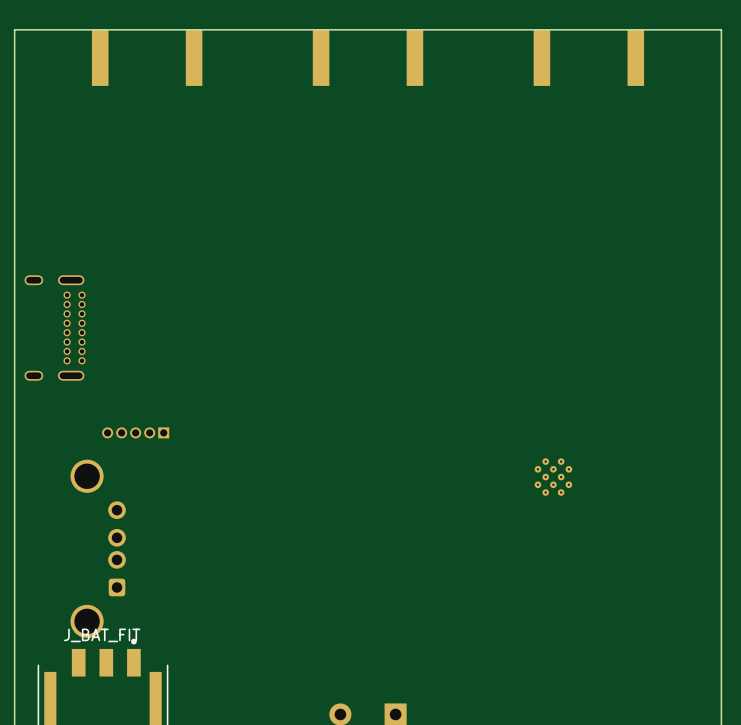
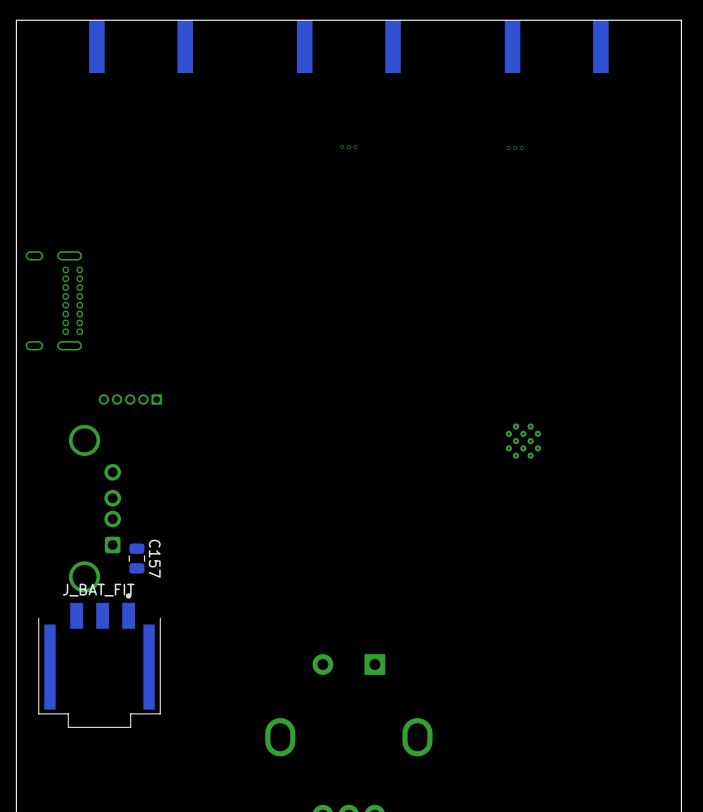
part: none -> (348, 147)
part: none -> (515, 148)
C157: none -> (136, 558)

